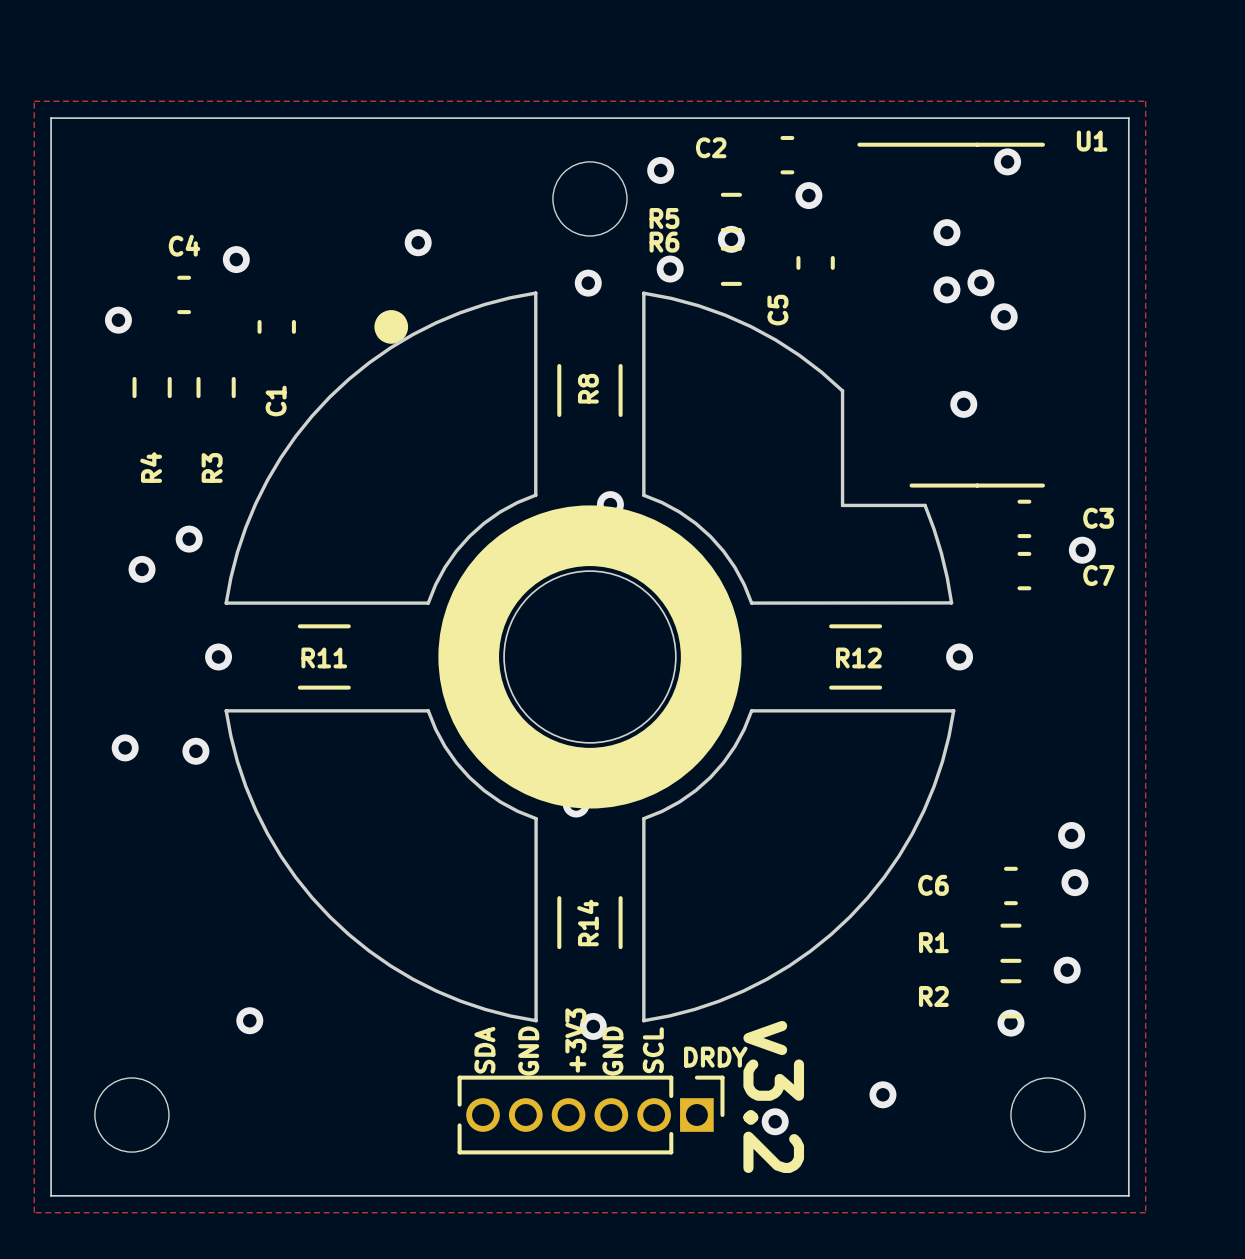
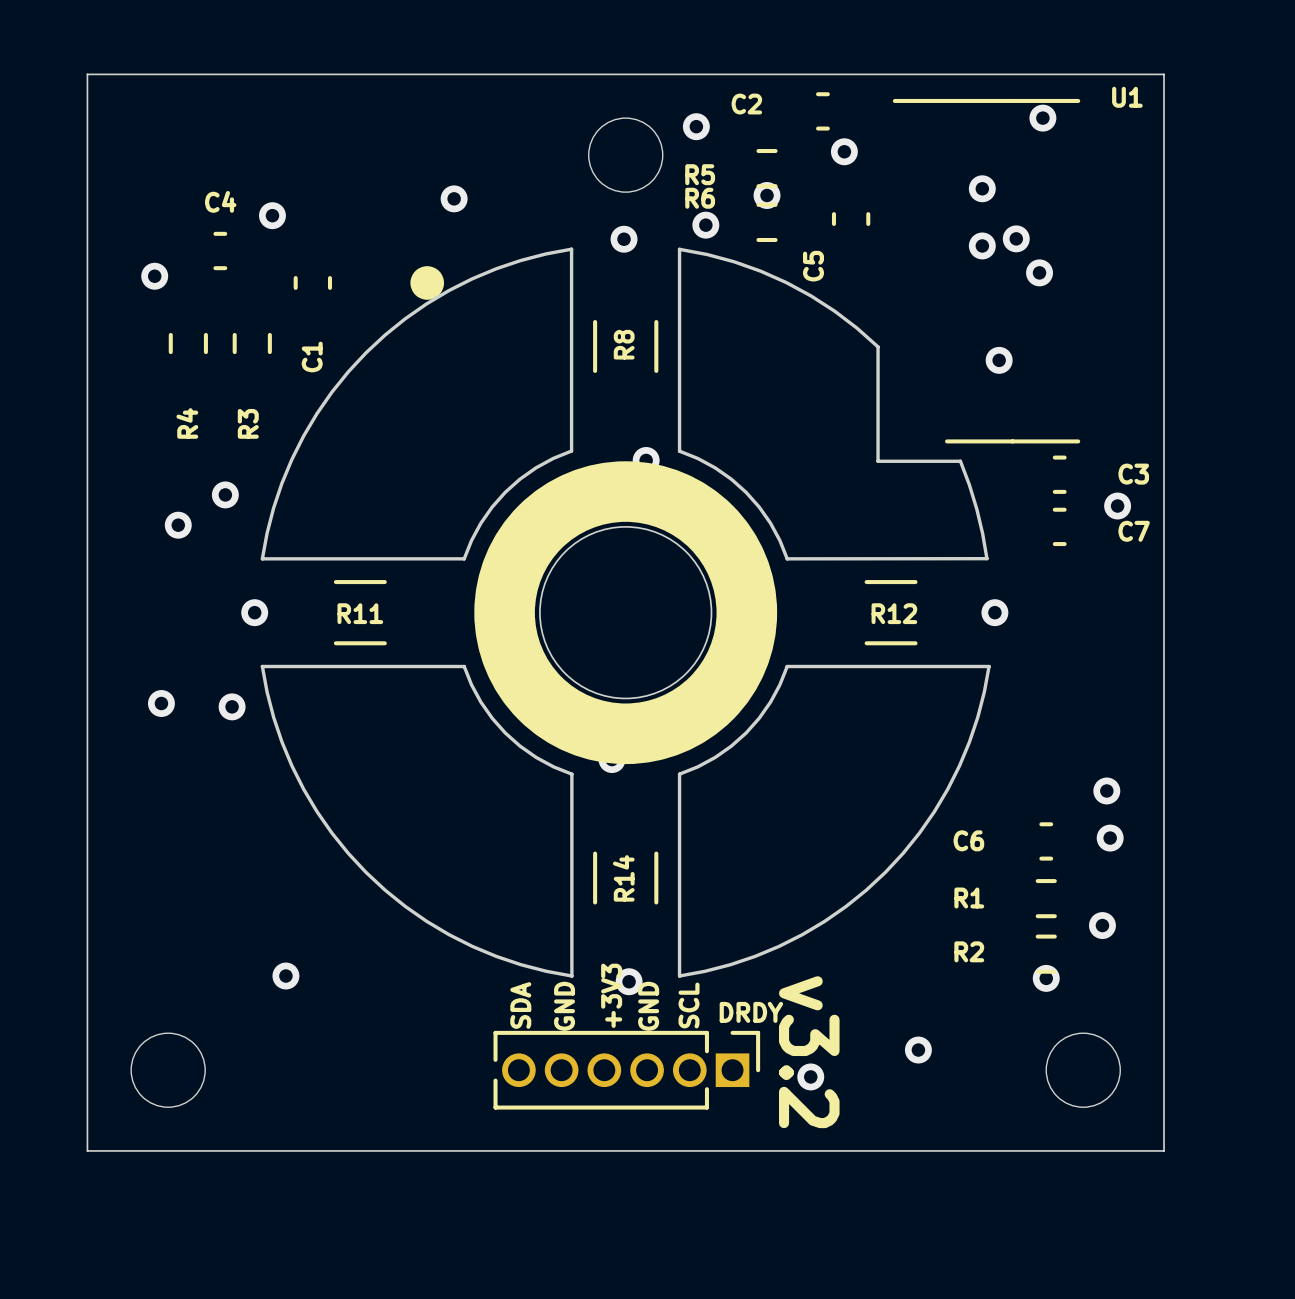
zone outline: (34, 101) (34, 1212) (1145, 1212) (1145, 101) (34, 101) -> none

